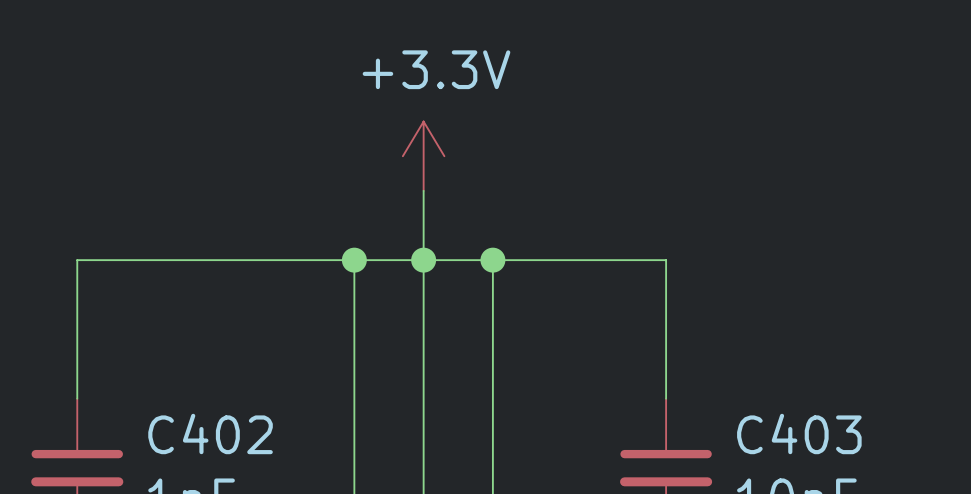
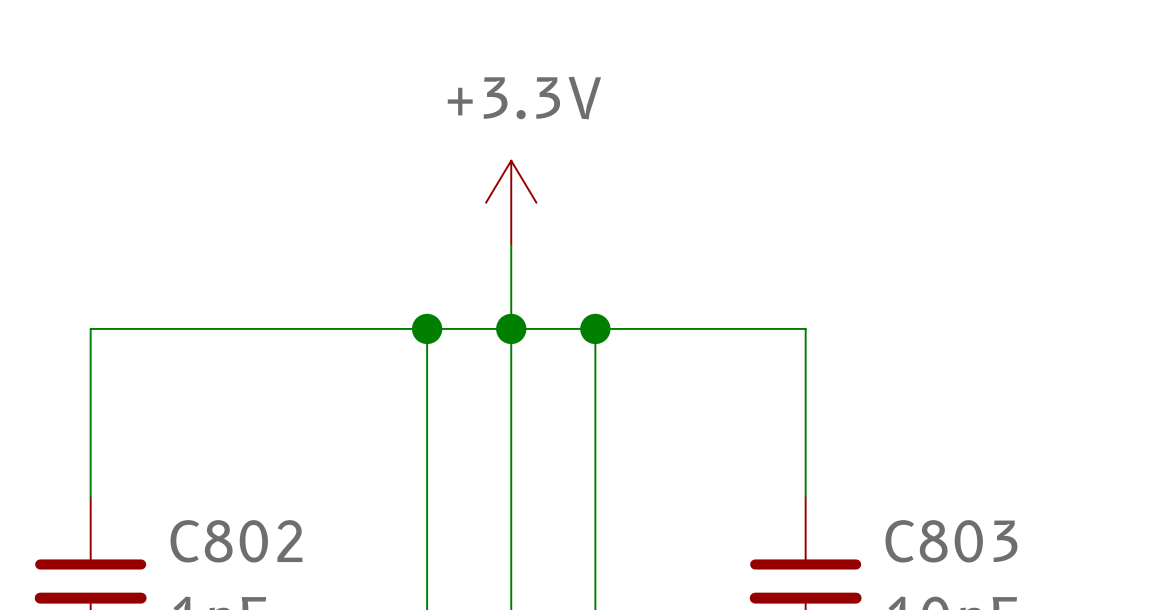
C402 name: C402 (210, 433) -> C802 (236, 541)
C403 name: C403 (799, 433) -> C803 (951, 541)

